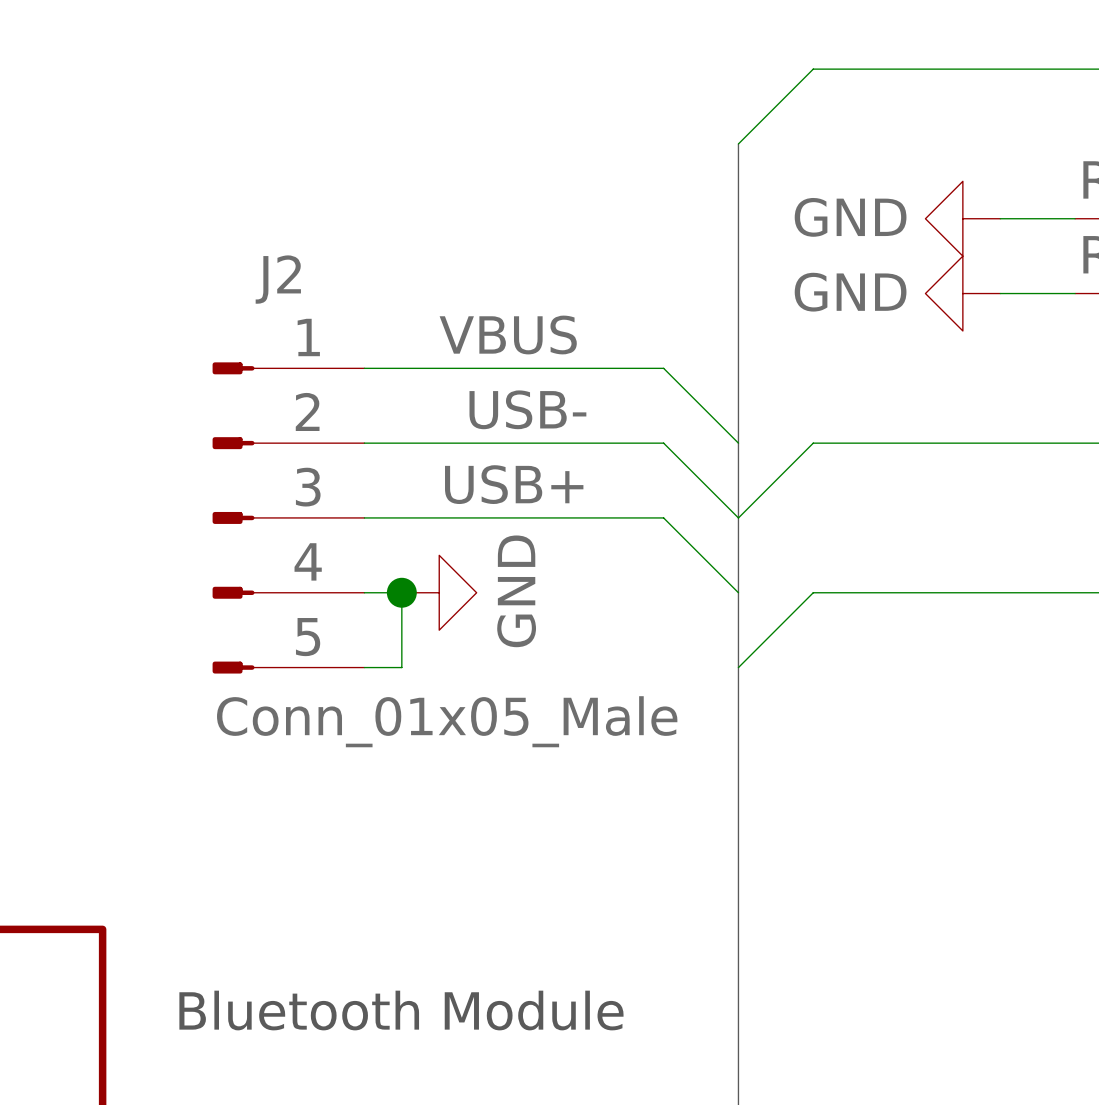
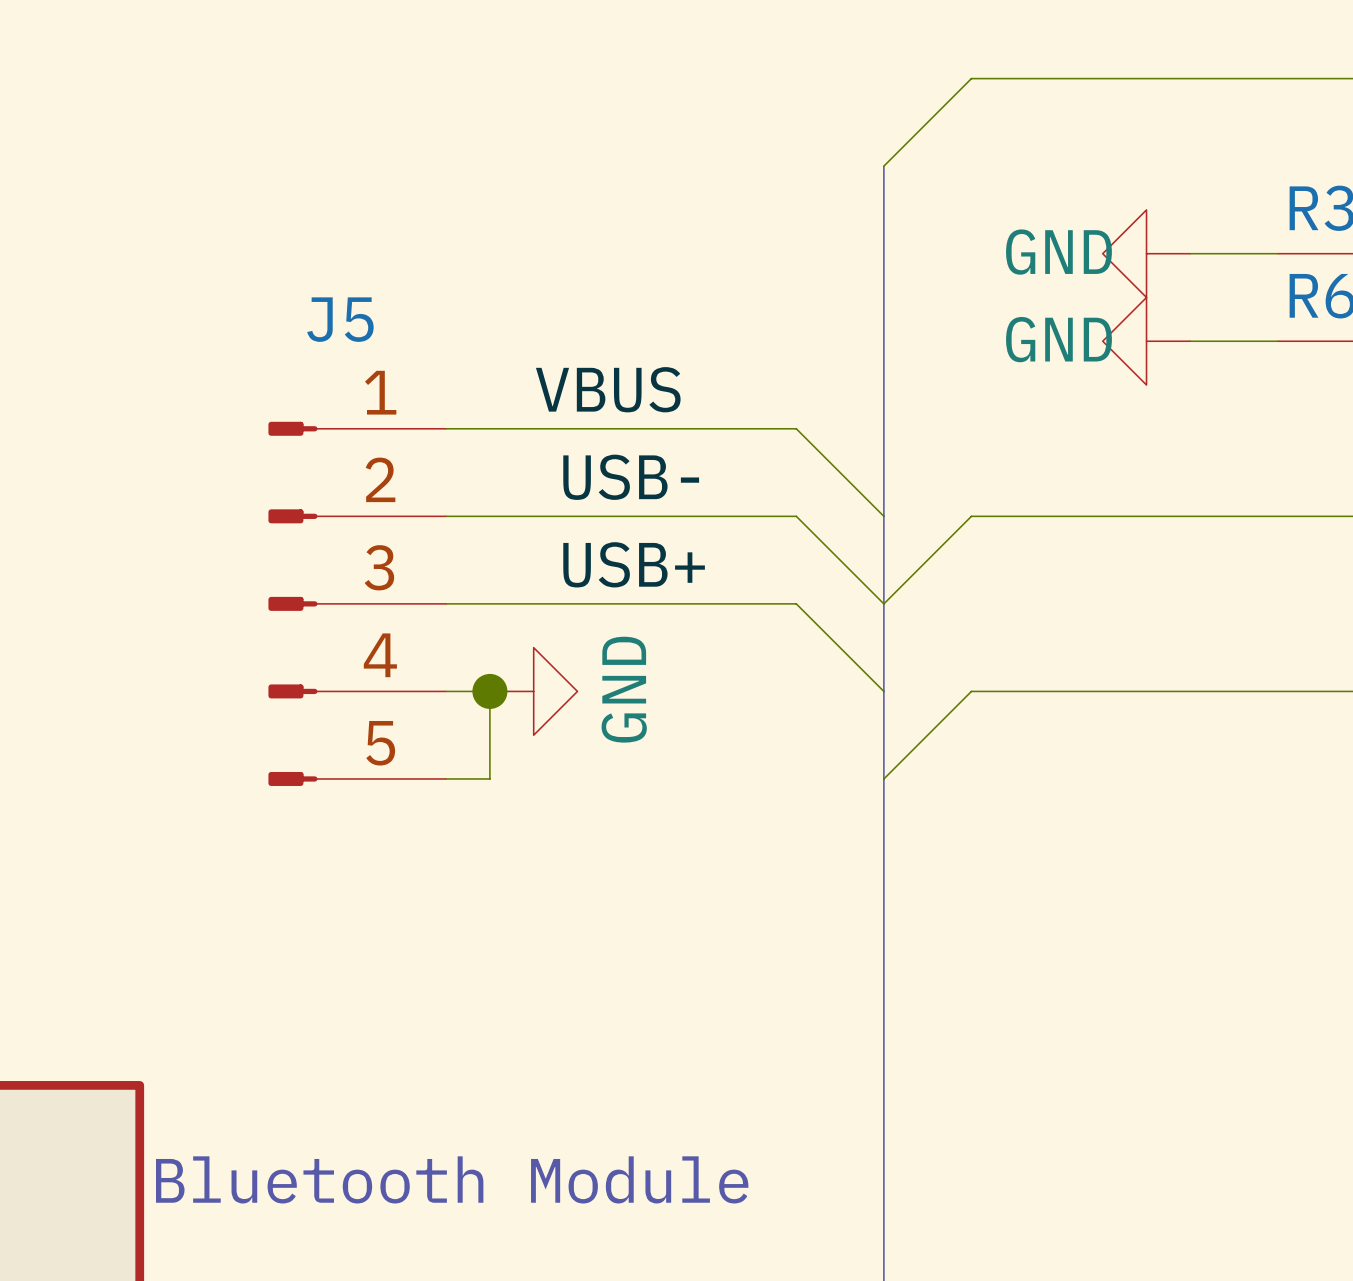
power symbol text position: GND (850, 217) -> GND (1058, 252)
J2 name: J2 (278, 279) -> J5 (340, 319)
power symbol text position: GND (850, 292) -> GND (1058, 339)
J2 value: Conn_01x05_Male (447, 721) -> none

